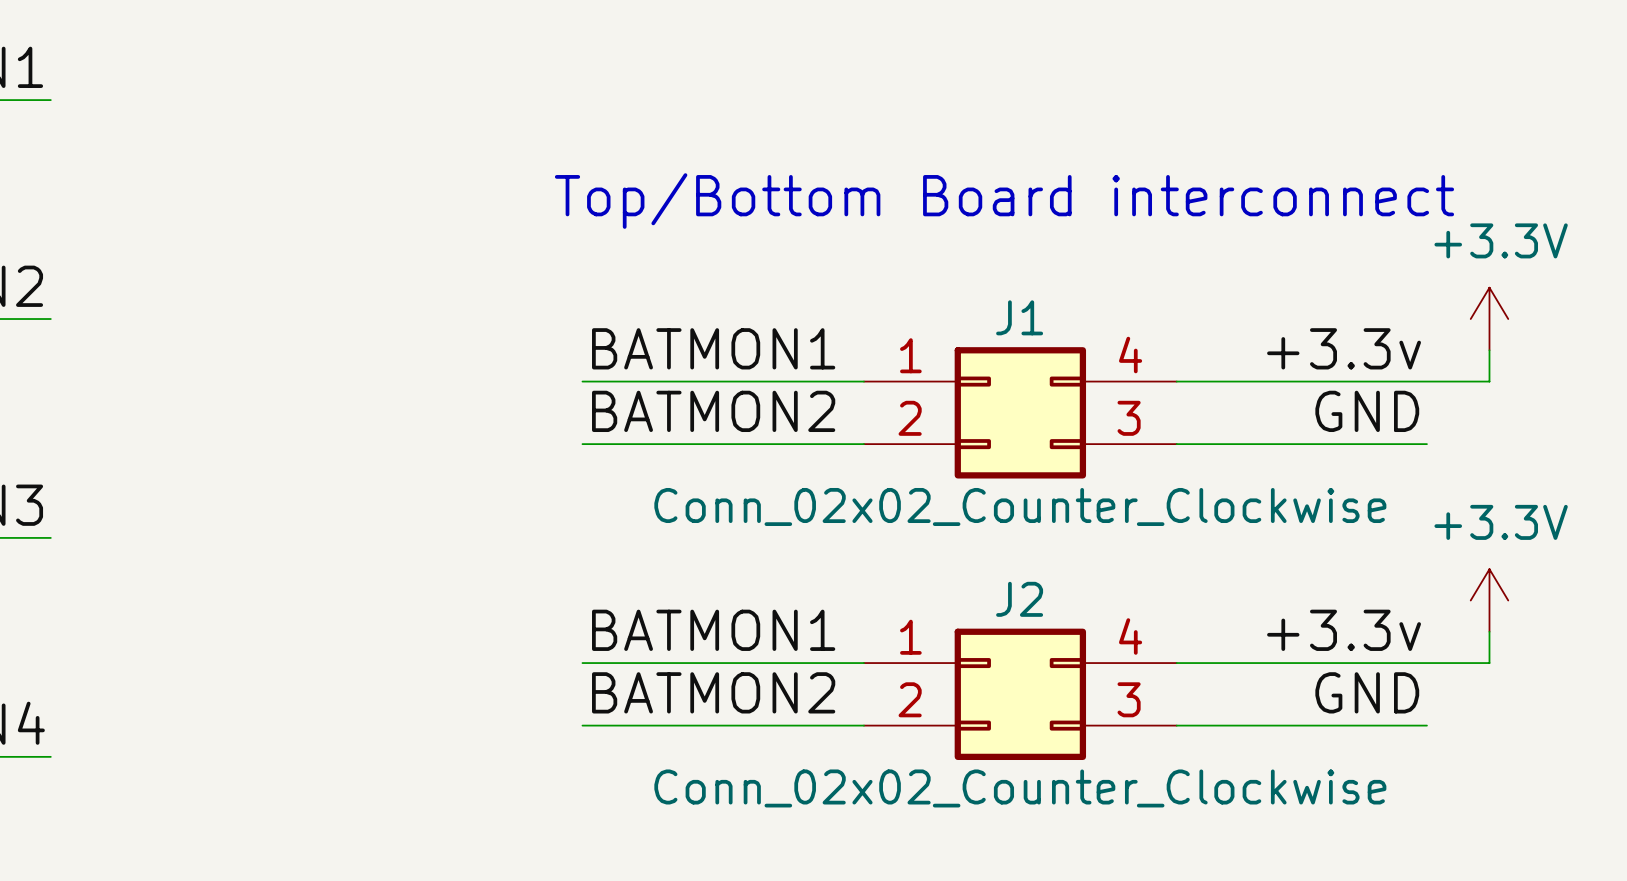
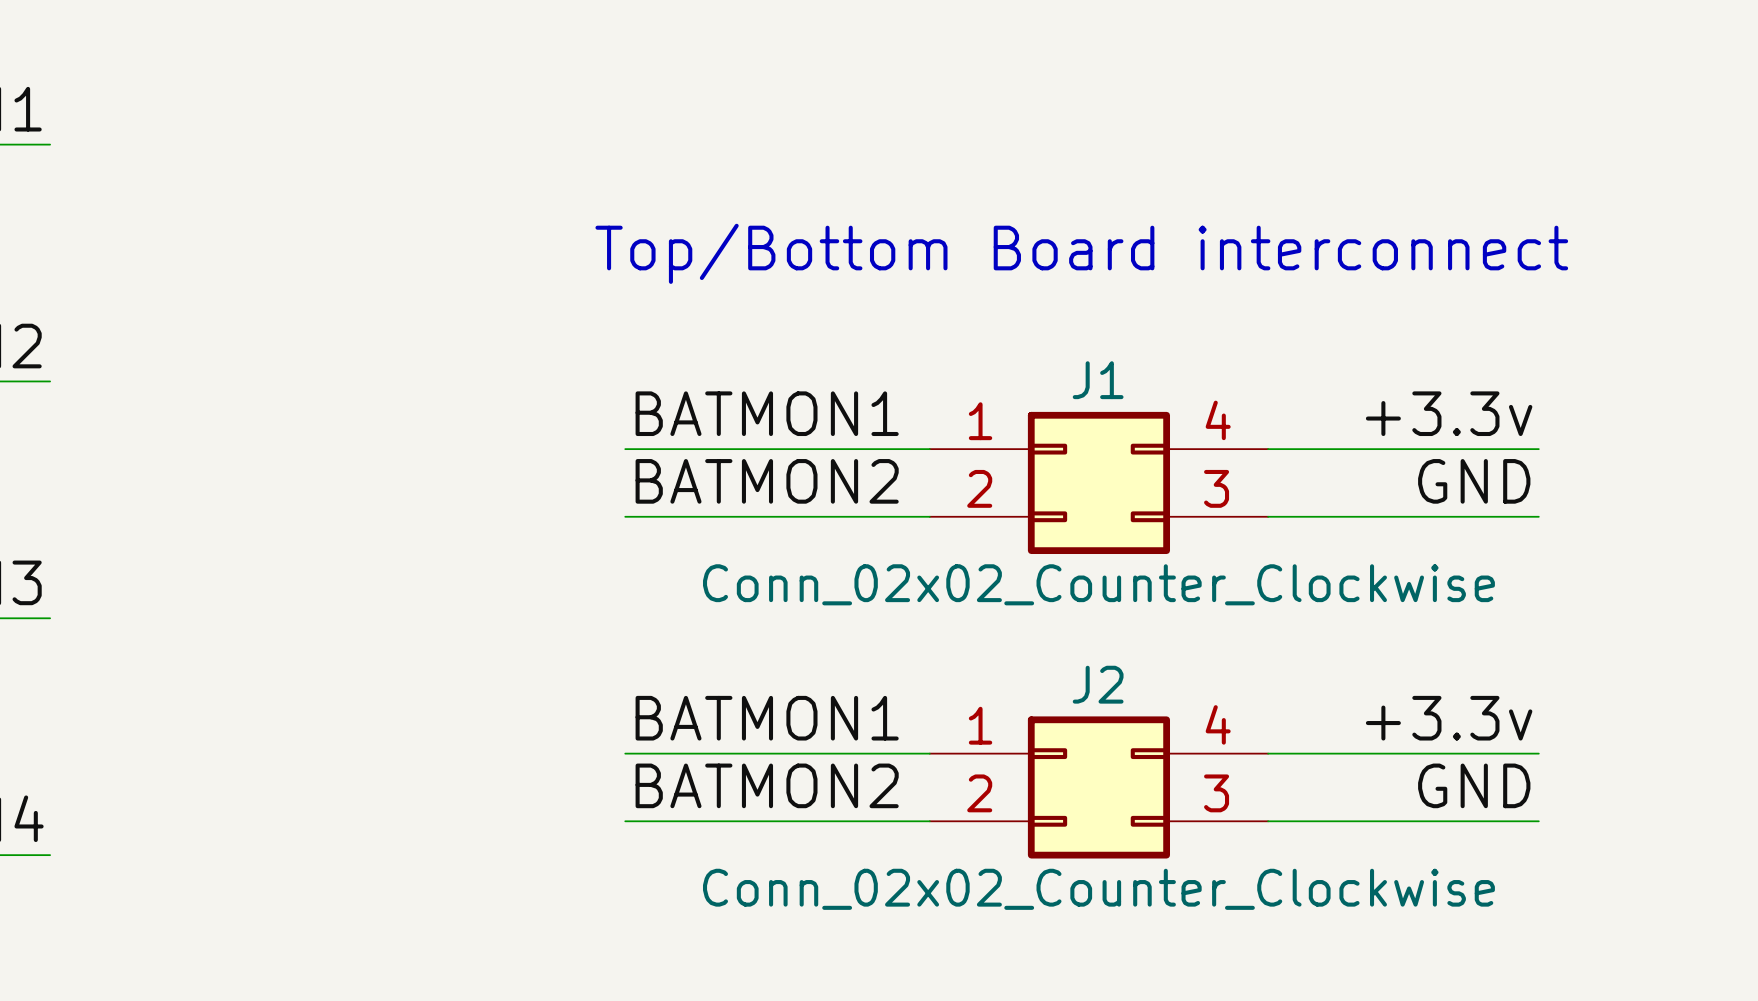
power symbol: +3.3V (1489, 319) -> none
wire: (1489, 350) (1489, 381) (1426, 381) -> none
power symbol: +3.3V (1489, 600) -> none
wire: (1489, 631) (1489, 663) (1426, 663) -> none

